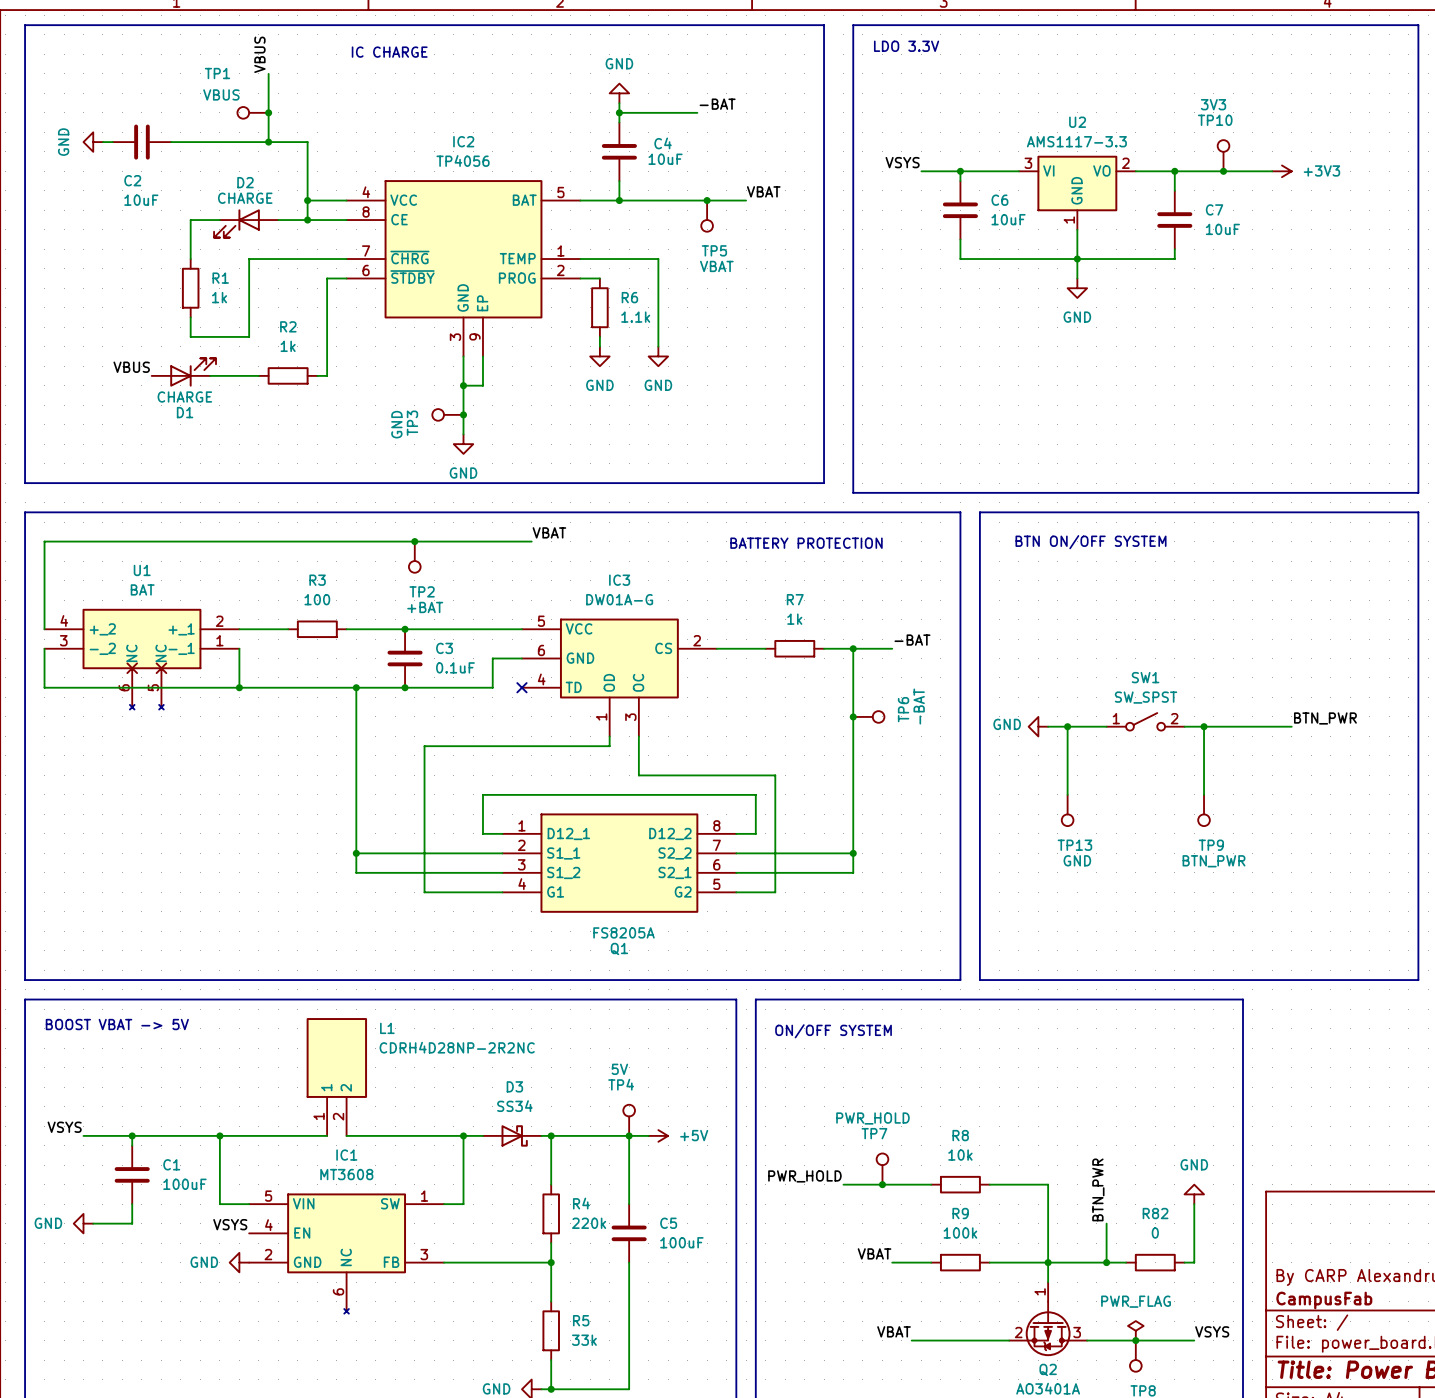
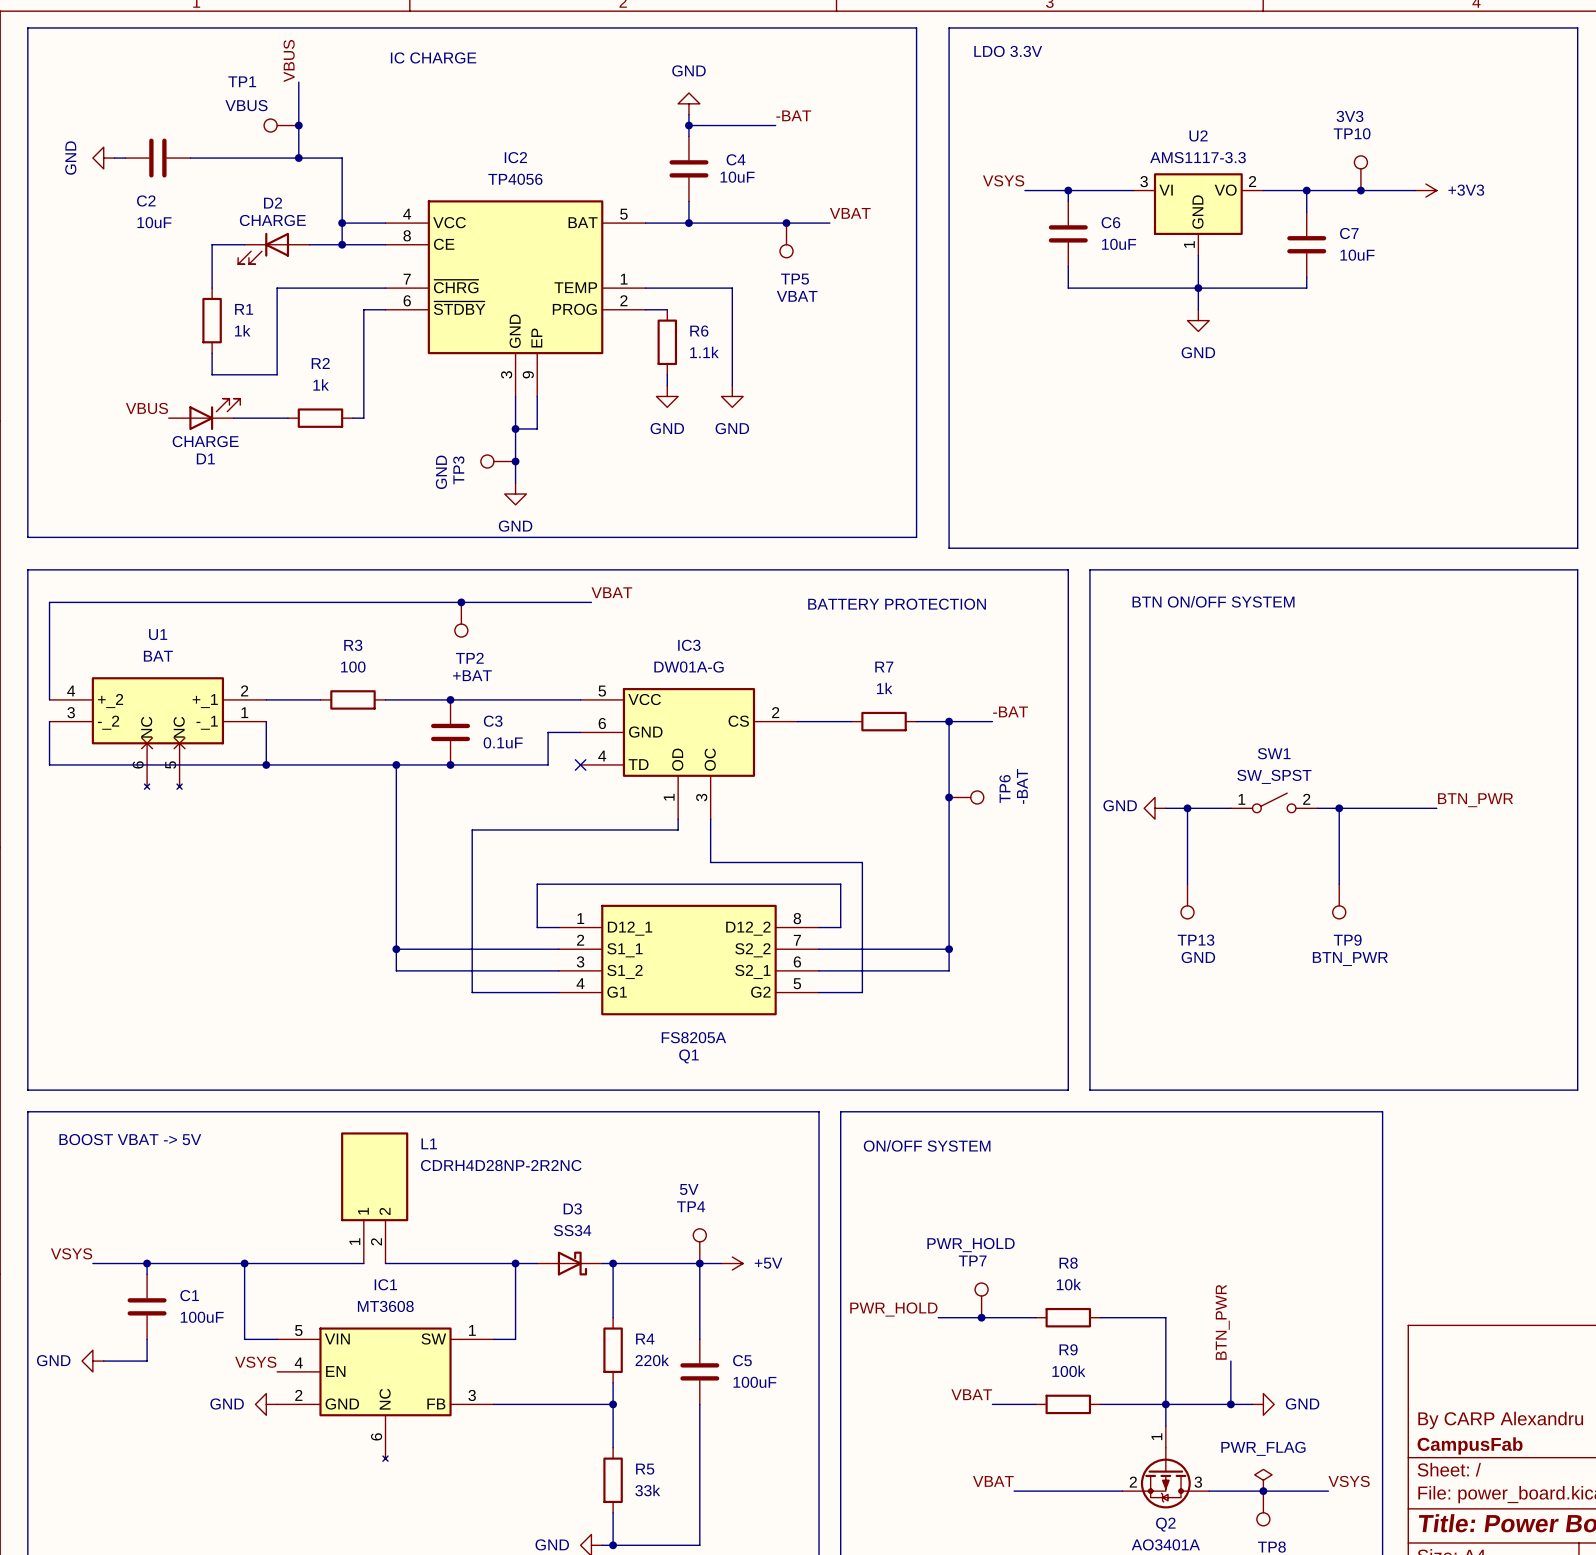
power symbol rotation: 0° (1194, 1194) -> 90° clockwise (1263, 1404)
power symbol position: GND (1194, 1194) -> GND (1263, 1404)
wire: (1194, 1204) (1194, 1262) (1184, 1262) -> none
R82: 0 (1155, 1262) -> none

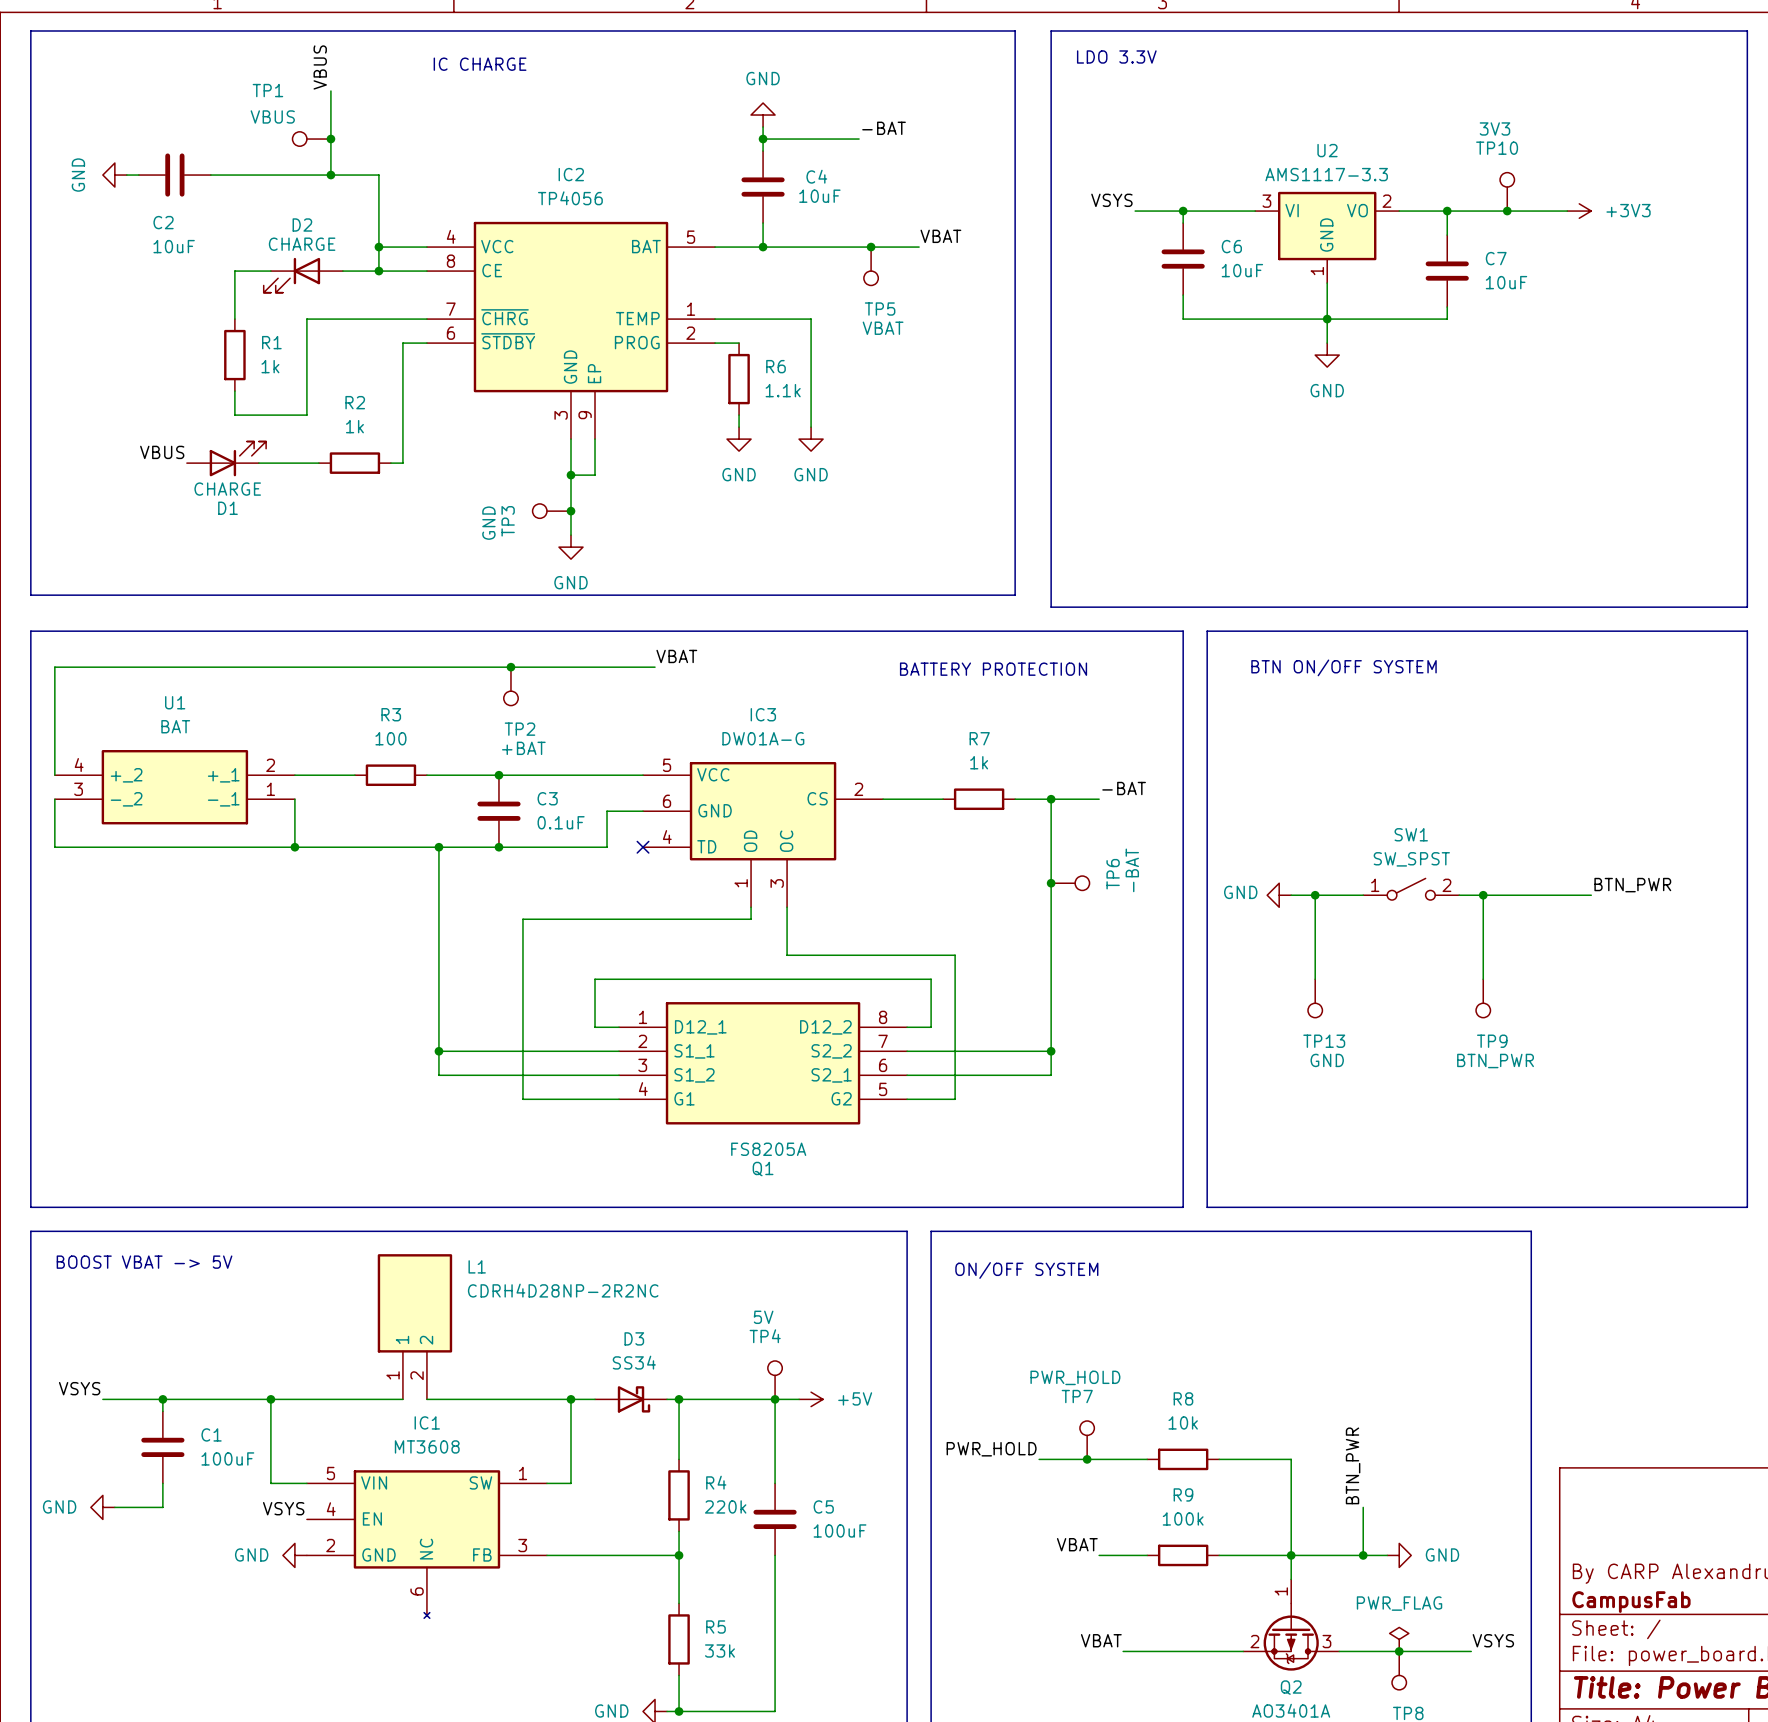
U1 symbol: [49, 677, 267, 790] -> [54, 750, 295, 825]

